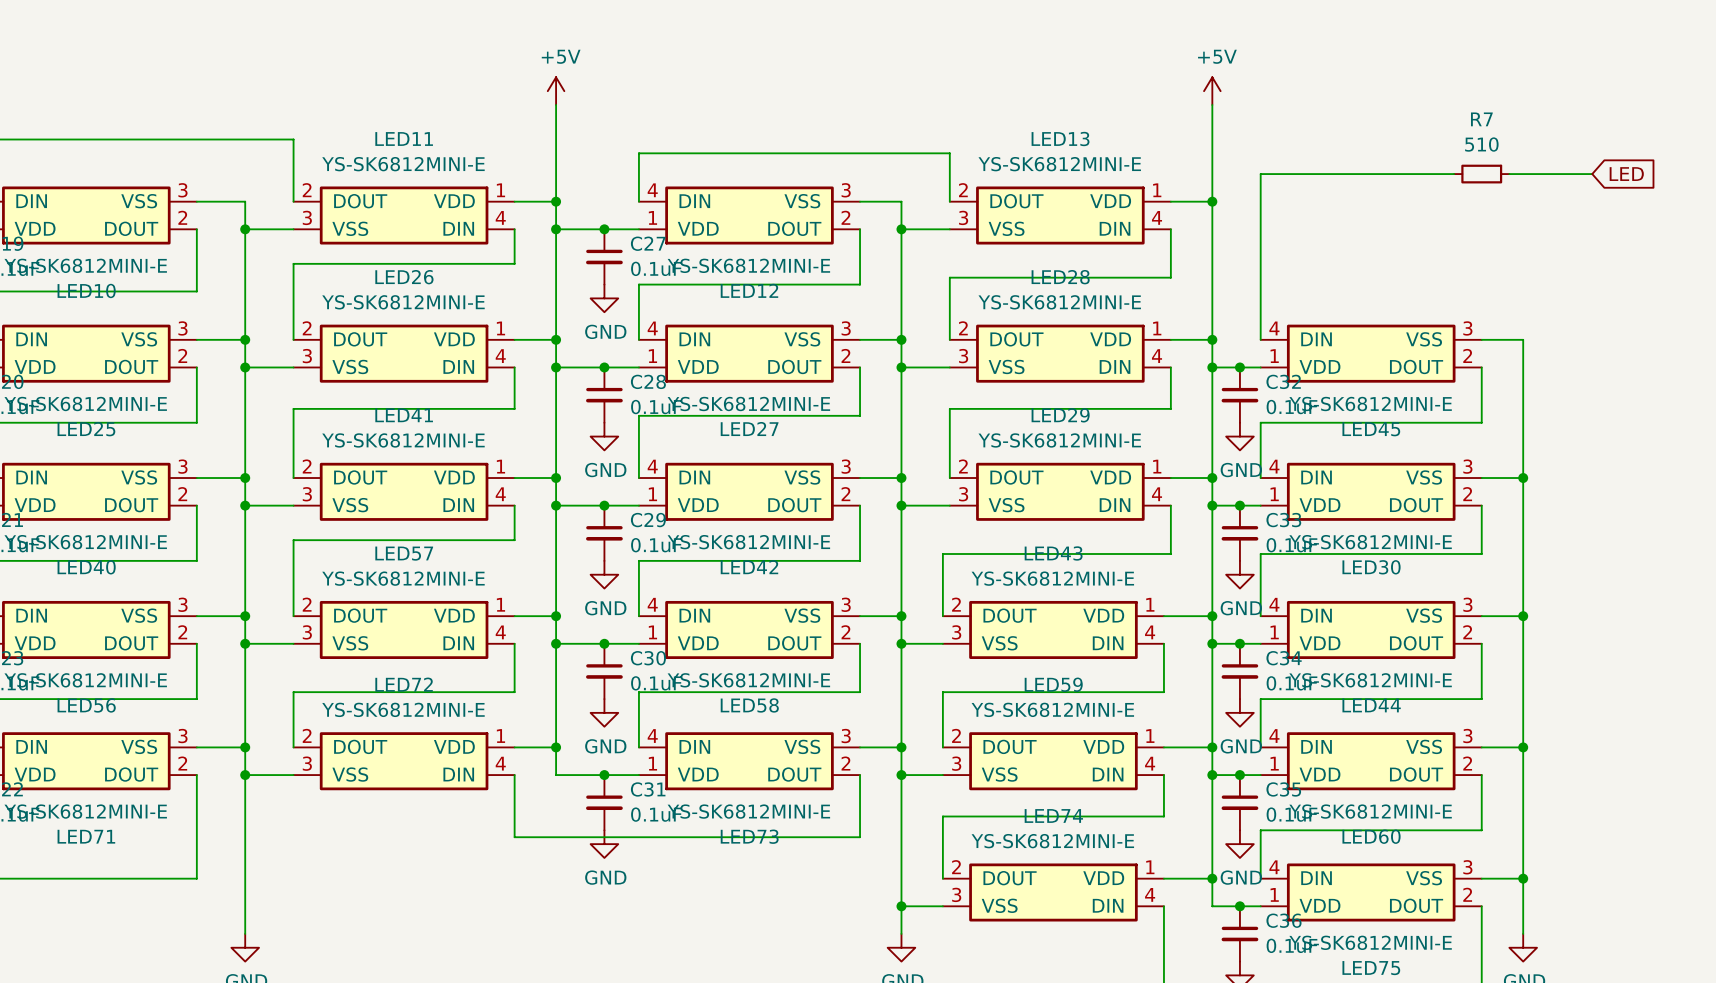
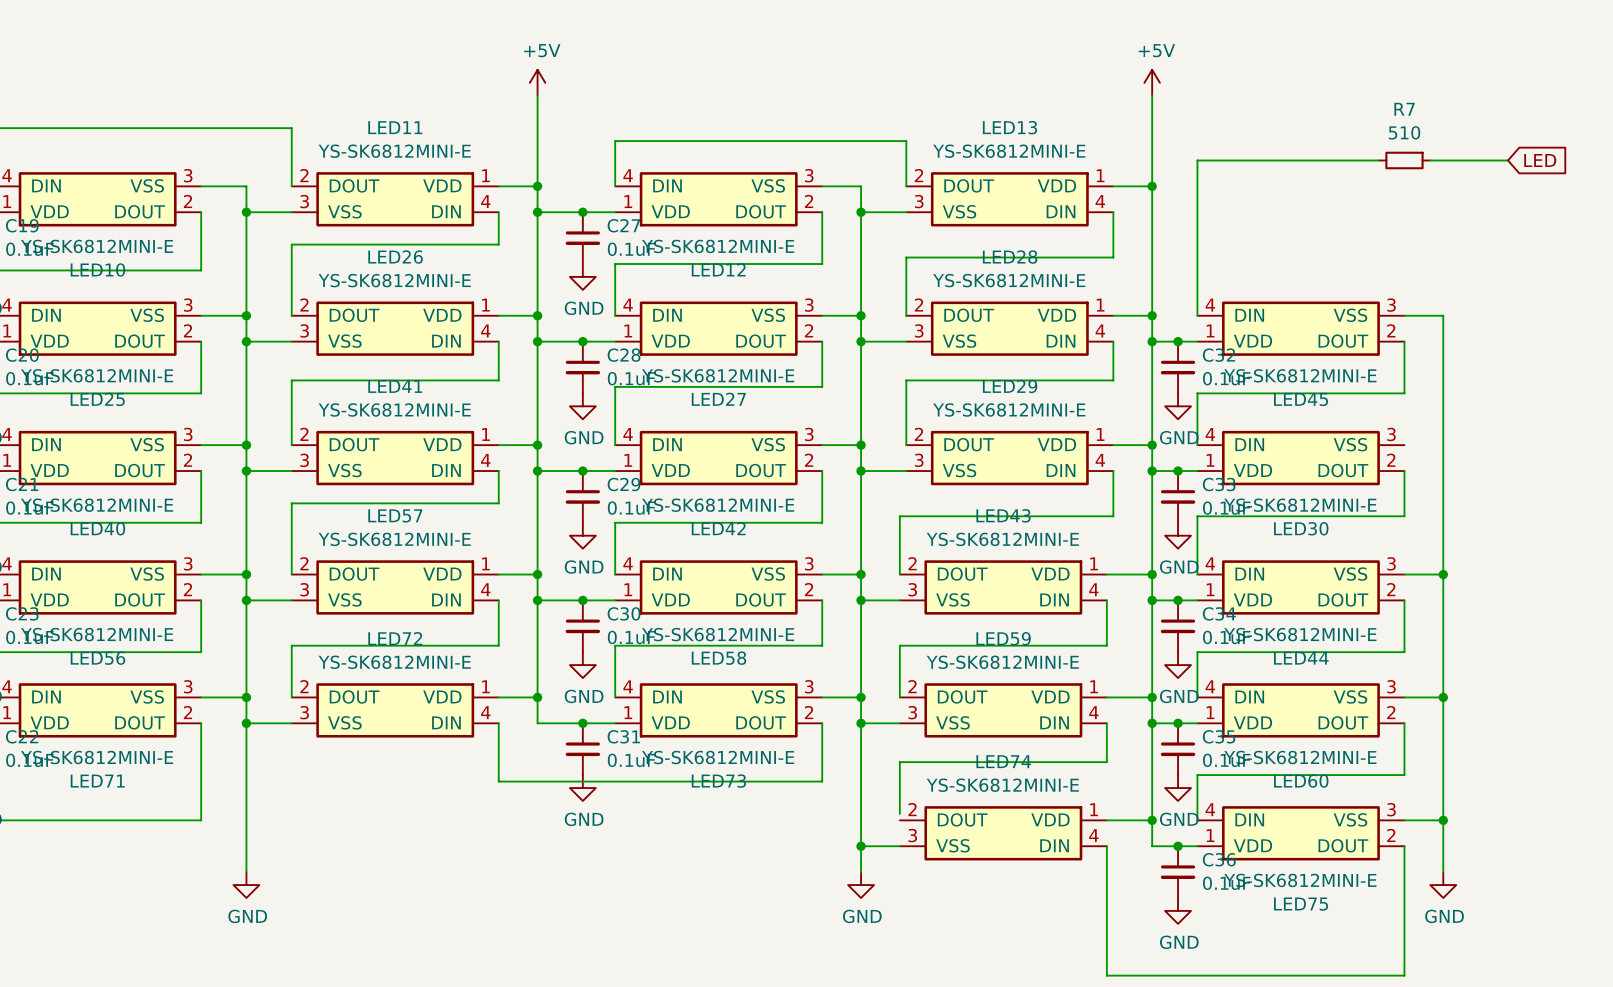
wire: (1481, 478) (1523, 478) -> none
junction: (1523, 478) -> none
wire: (942, 871) (942, 878) -> none

